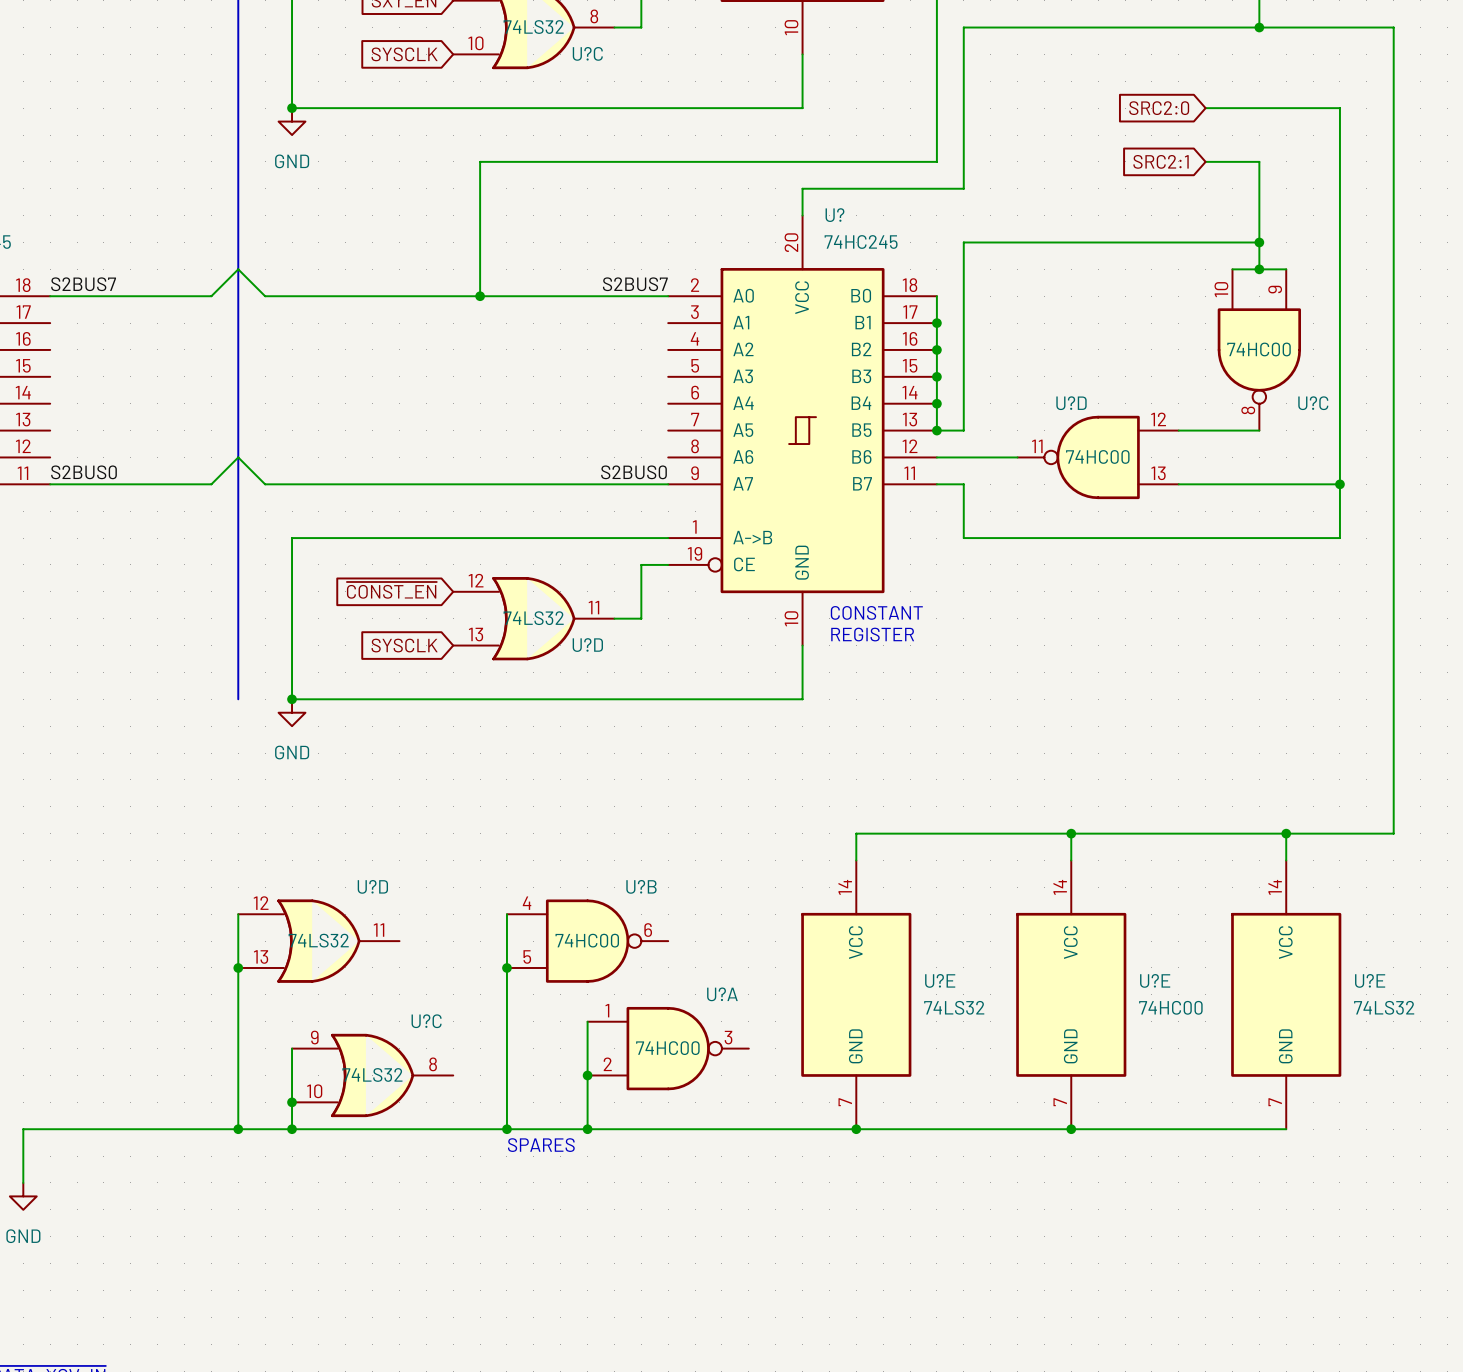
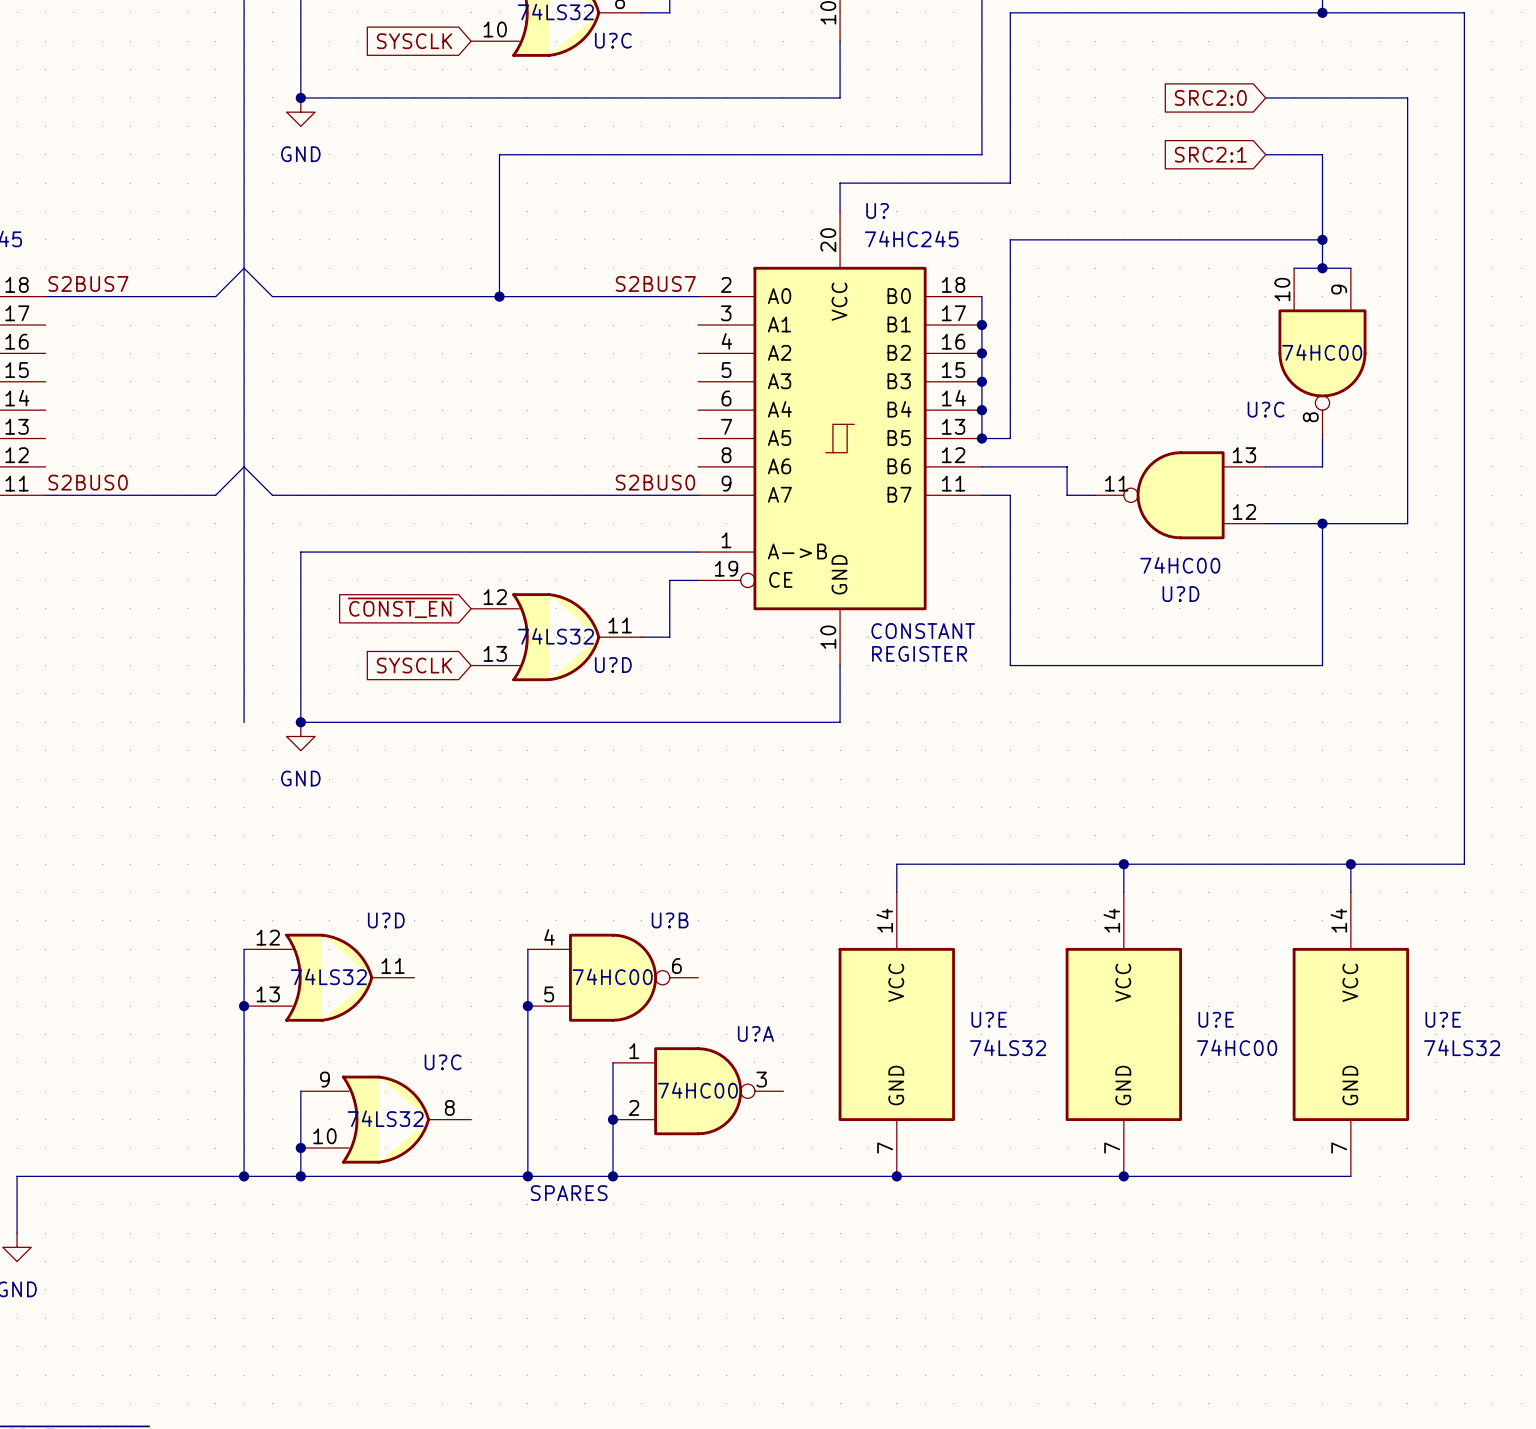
U?C name position: U?C (1313, 403) -> U?C (1266, 409)
wire: (1178, 430) (1259, 430) -> (1265, 466) (1322, 466) (1322, 438)
wire: none -> (1067, 466) (1067, 495) (1095, 495)
U?D: 74HC00 (1098, 457) -> none
U?D: none -> 74HC00 (1180, 495)
wire: (1178, 484) (1339, 484) -> none
junction: (1339, 484) -> none
wire: none -> (1265, 523) (1407, 523)
junction: none -> (1322, 523)
wire: (1339, 511) (1339, 538) (963, 538) -> (1322, 523) (1322, 665) (1010, 665) (1010, 552)

